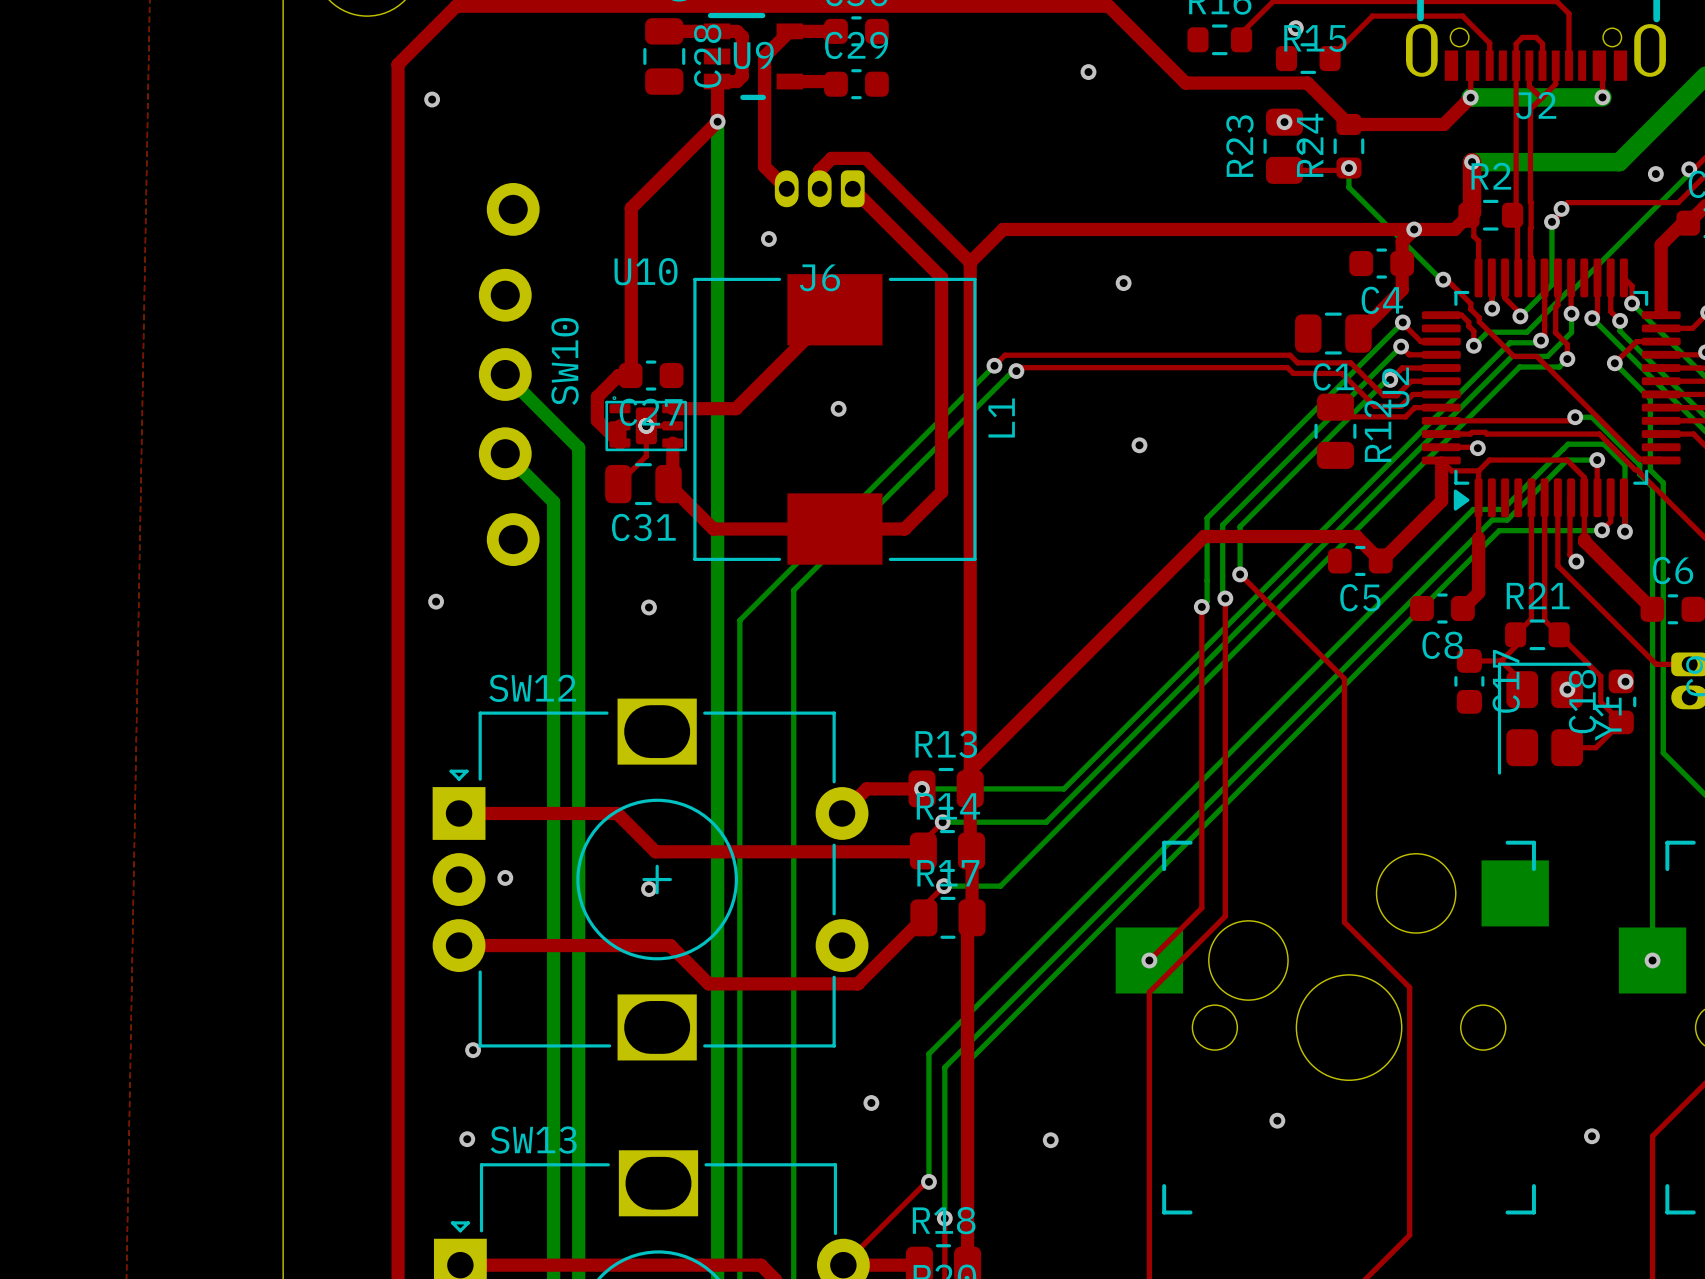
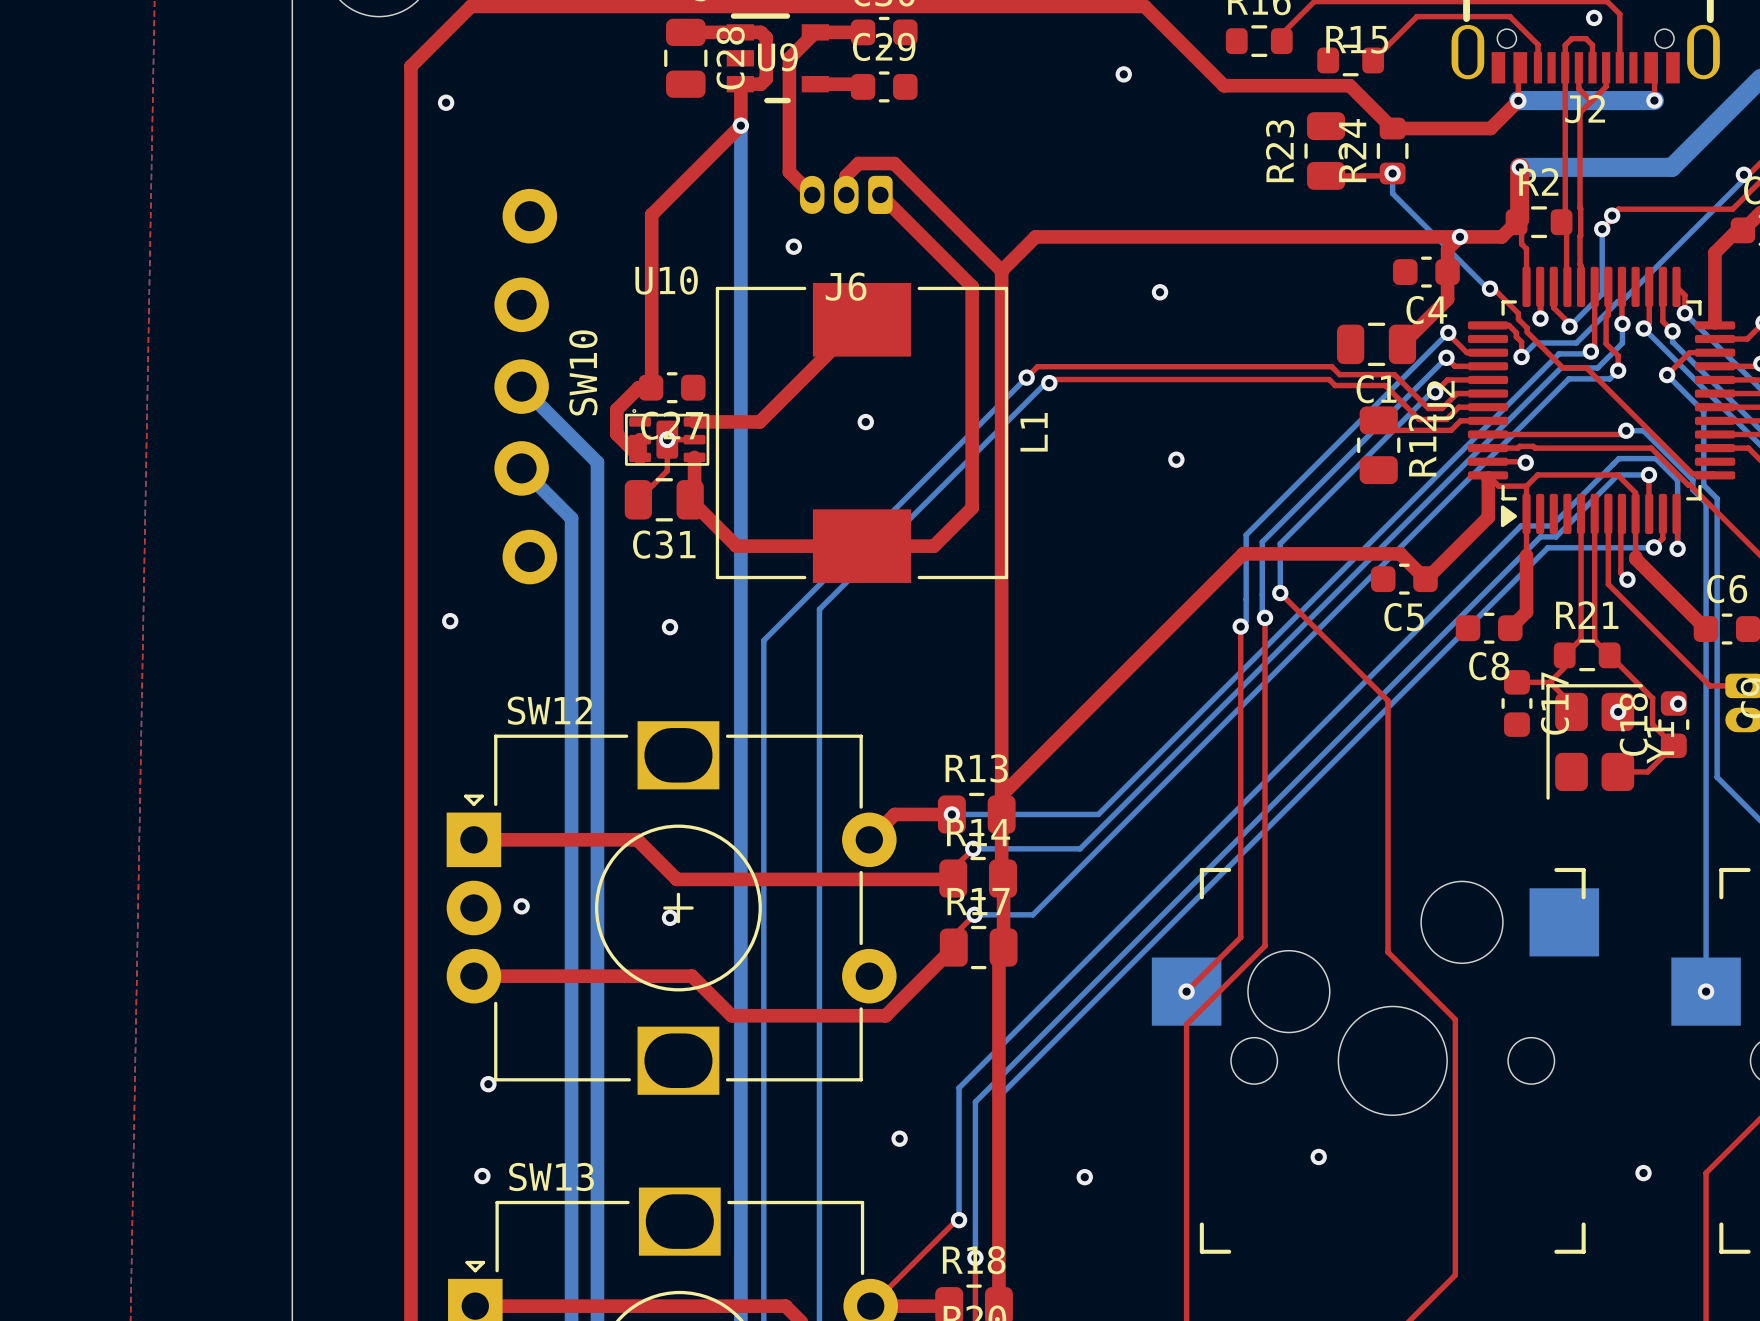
via: none -> (1594, 17)
via: (1295, 28) -> none
via: (1284, 122) -> none
via: (1655, 174) -> none

